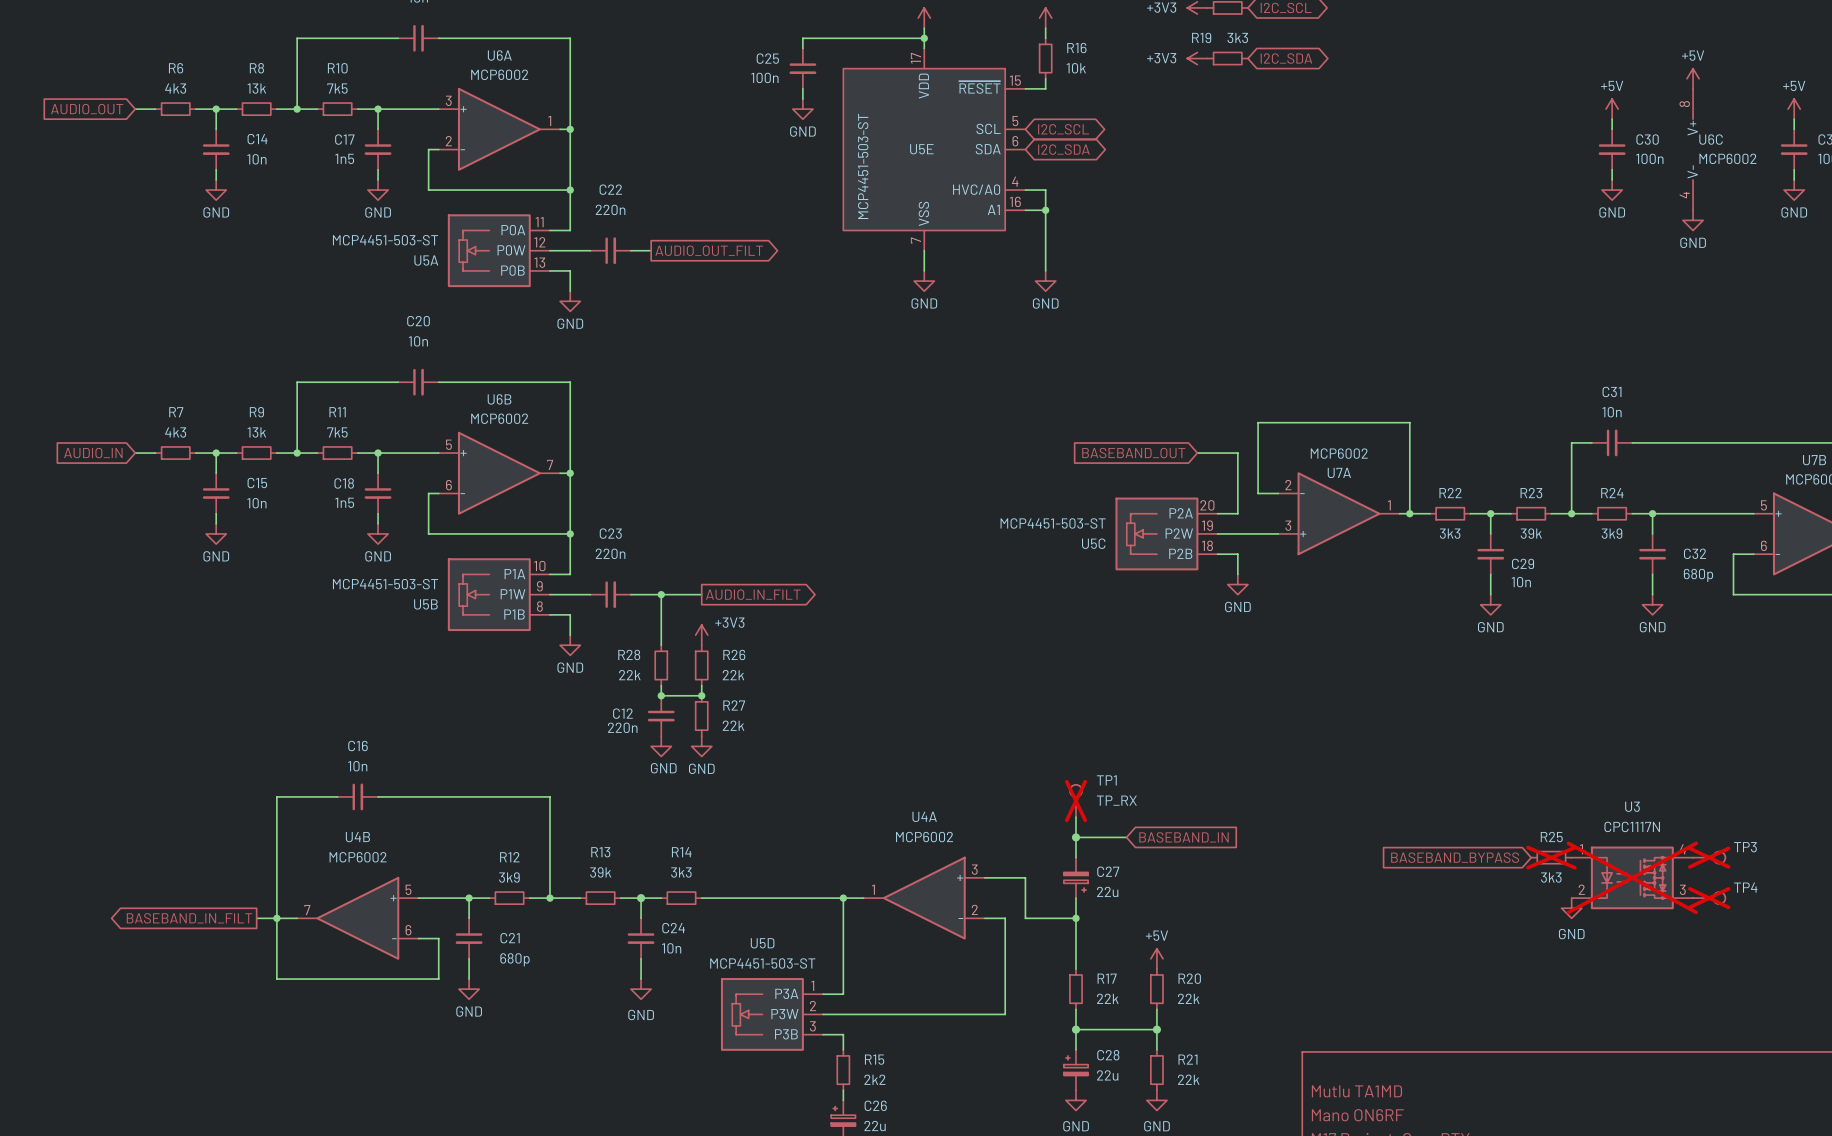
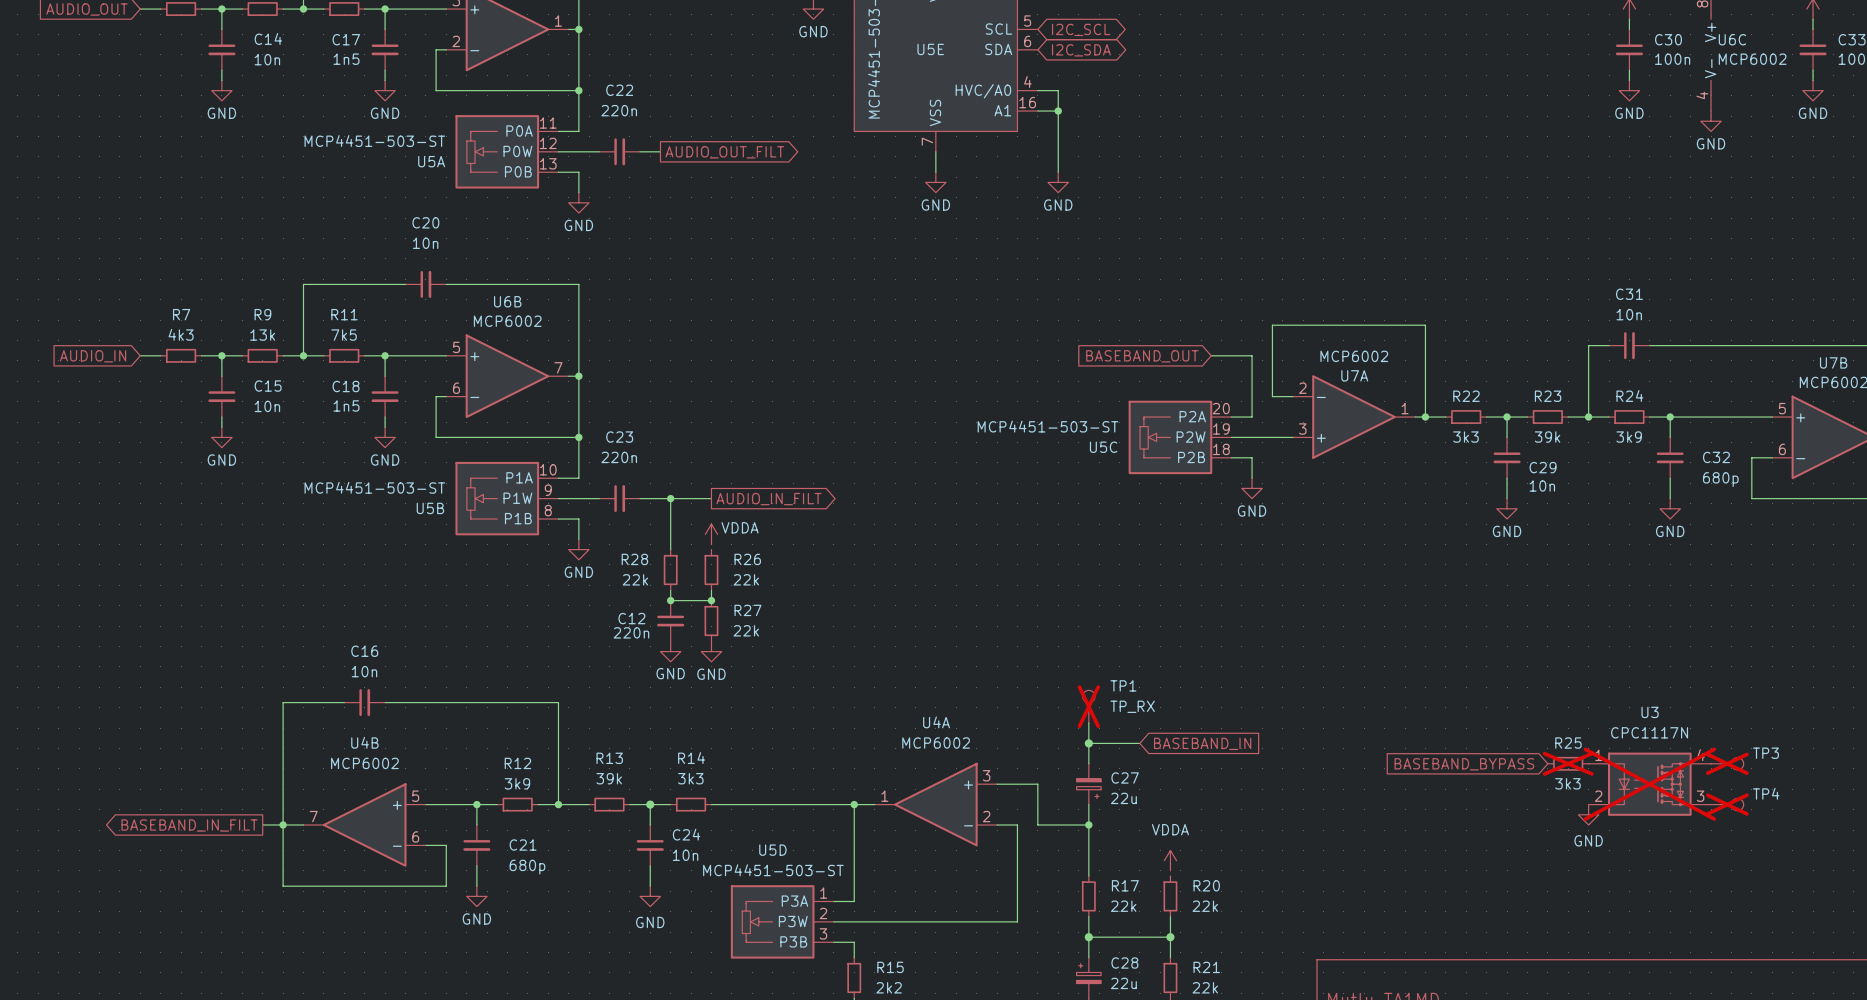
power symbol: +3V3 (701, 635) -> VDDA (711, 534)
power symbol: +5V (1156, 958) -> VDDA (1170, 860)

